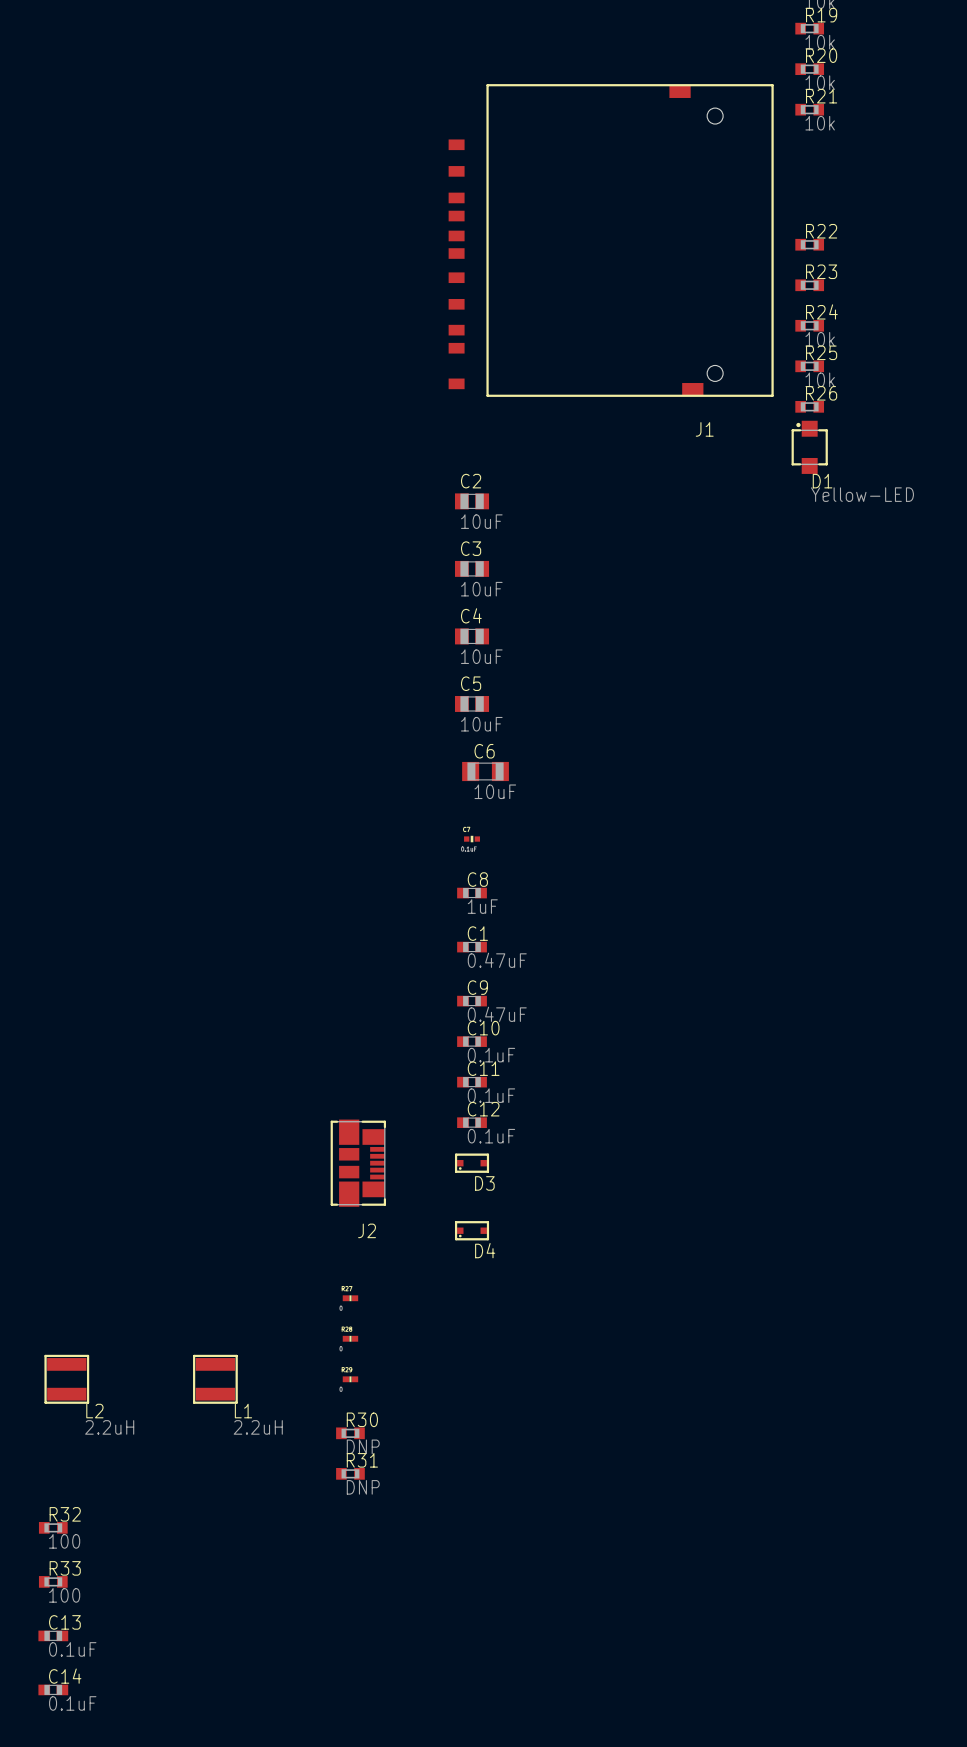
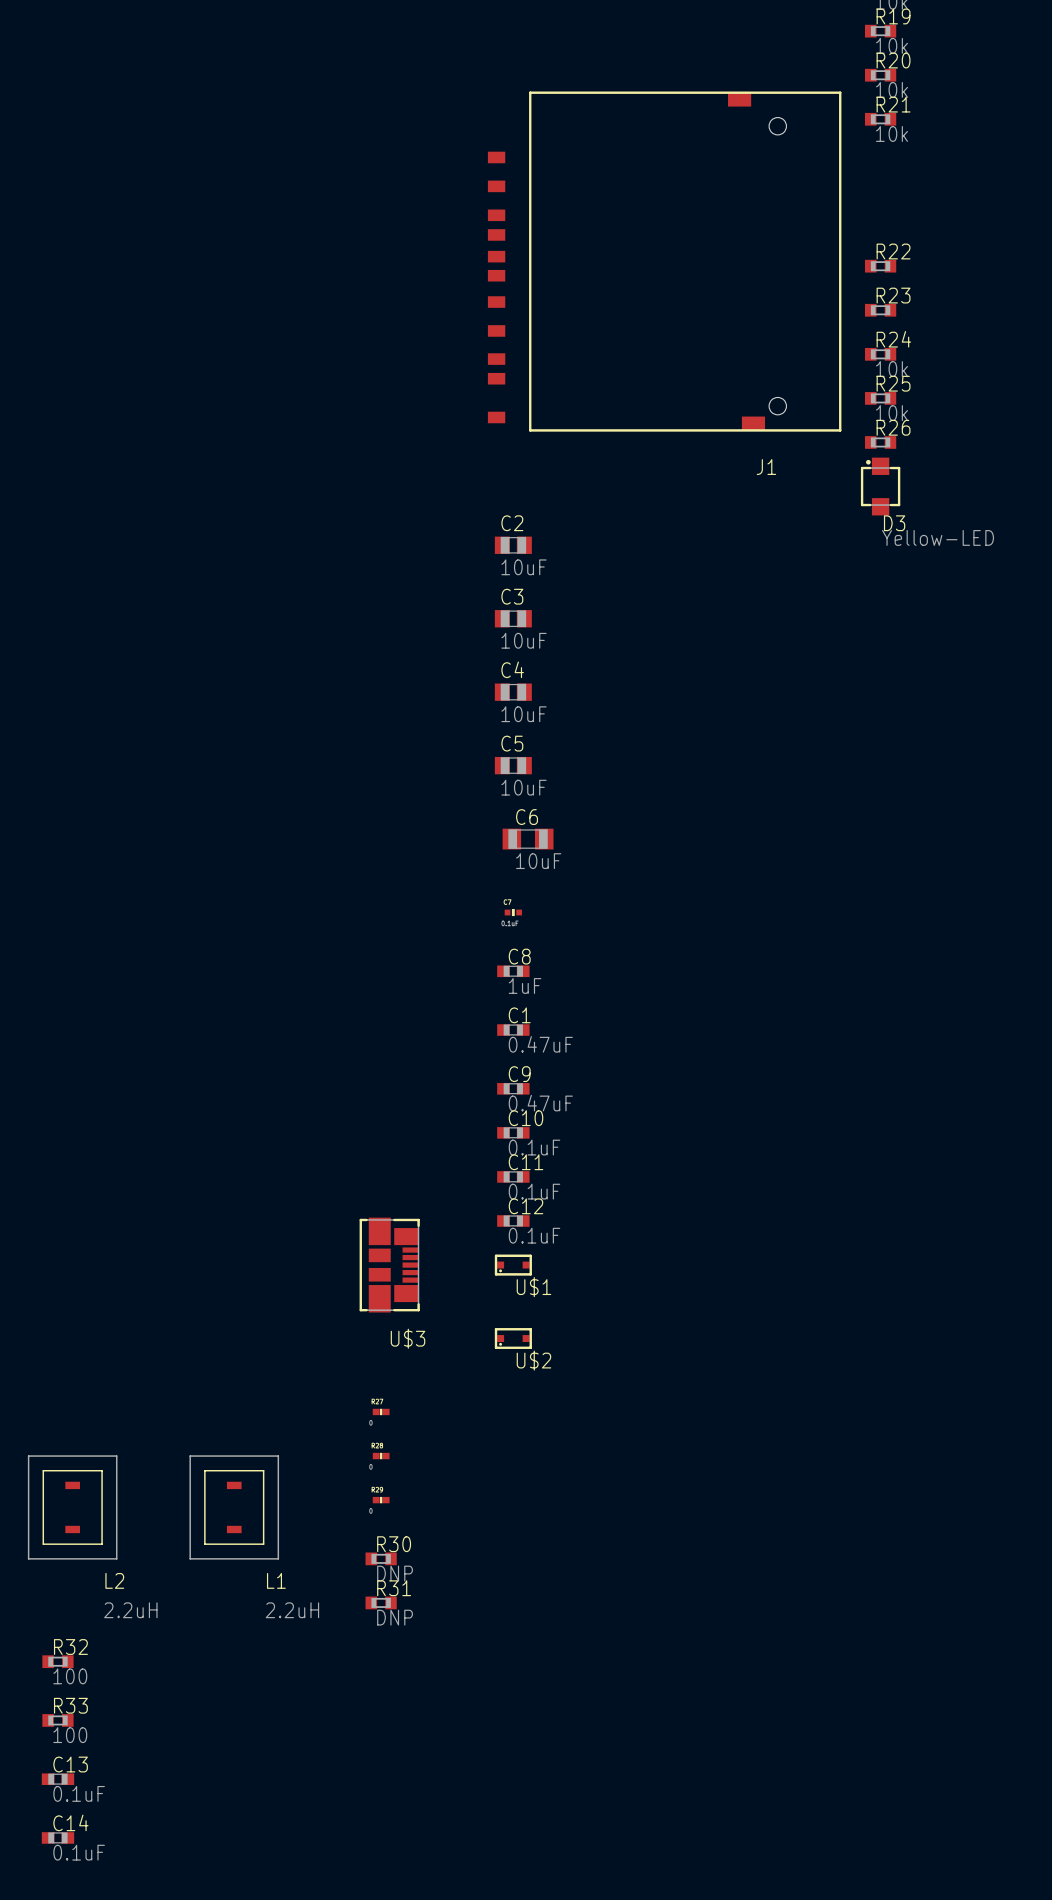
D1 name: D1 (822, 481) -> D3 (894, 523)
D3 name: D3 (484, 1183) -> U$1 (533, 1287)
J2 name: J2 (367, 1230) -> U$3 (408, 1338)
D4 name: D4 (485, 1250) -> U$2 (533, 1360)
L2 footprint: [44, 1354, 90, 1404] -> [27, 1455, 118, 1560]
L1 footprint: [193, 1354, 238, 1404] -> [189, 1455, 280, 1560]
L2 name position: L2 (94, 1411) -> L2 (114, 1580)
L1 name position: L1 (243, 1411) -> L1 (276, 1580)
L2 value position: 2.2uH (109, 1427) -> 2.2uH (130, 1610)
L1 value position: 2.2uH (258, 1427) -> 2.2uH (292, 1610)

